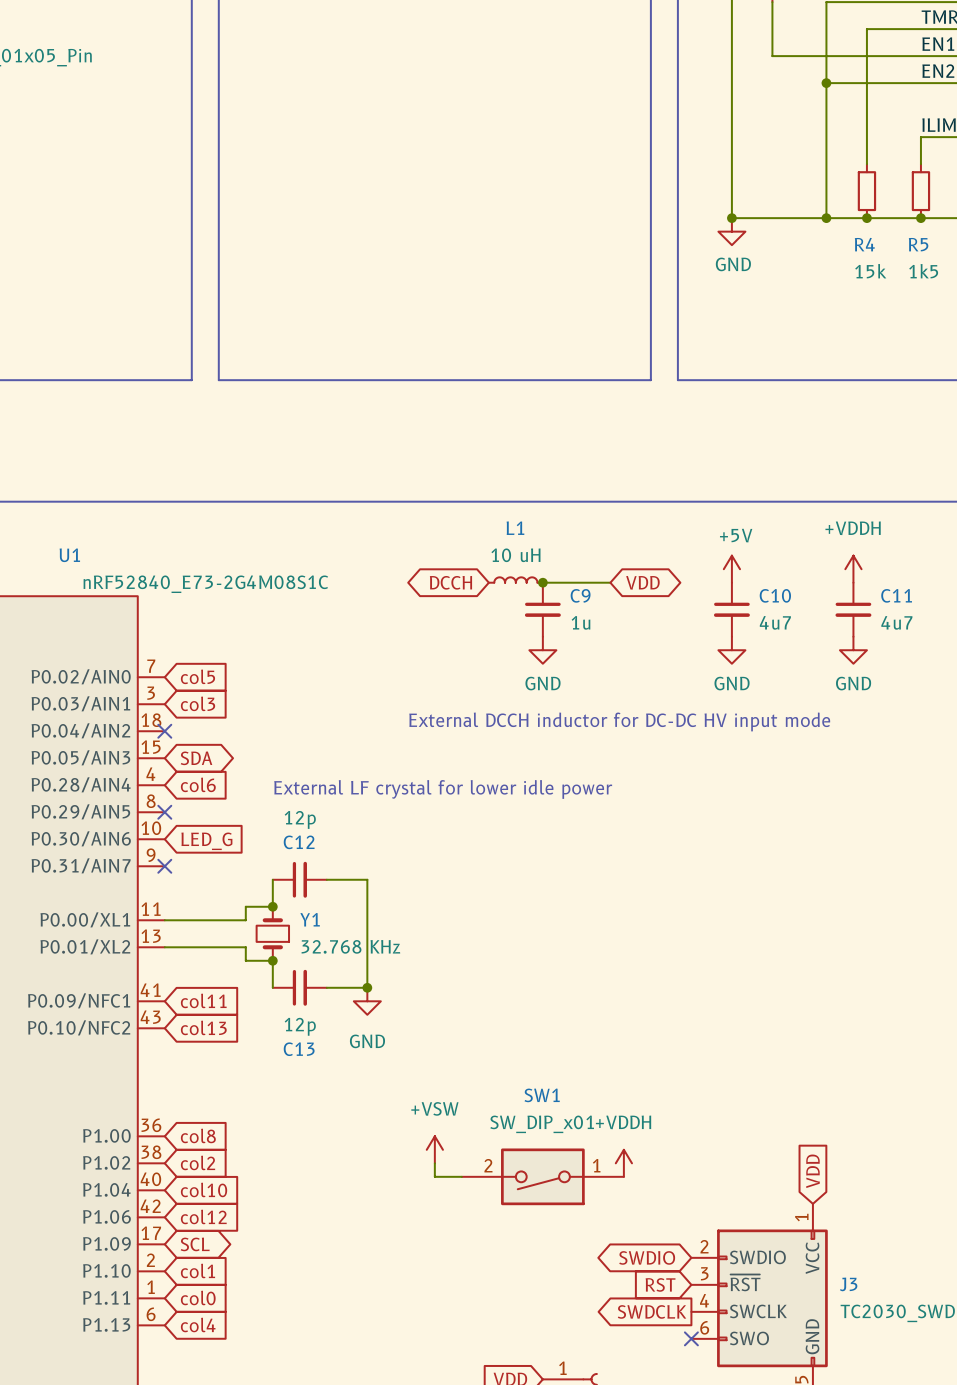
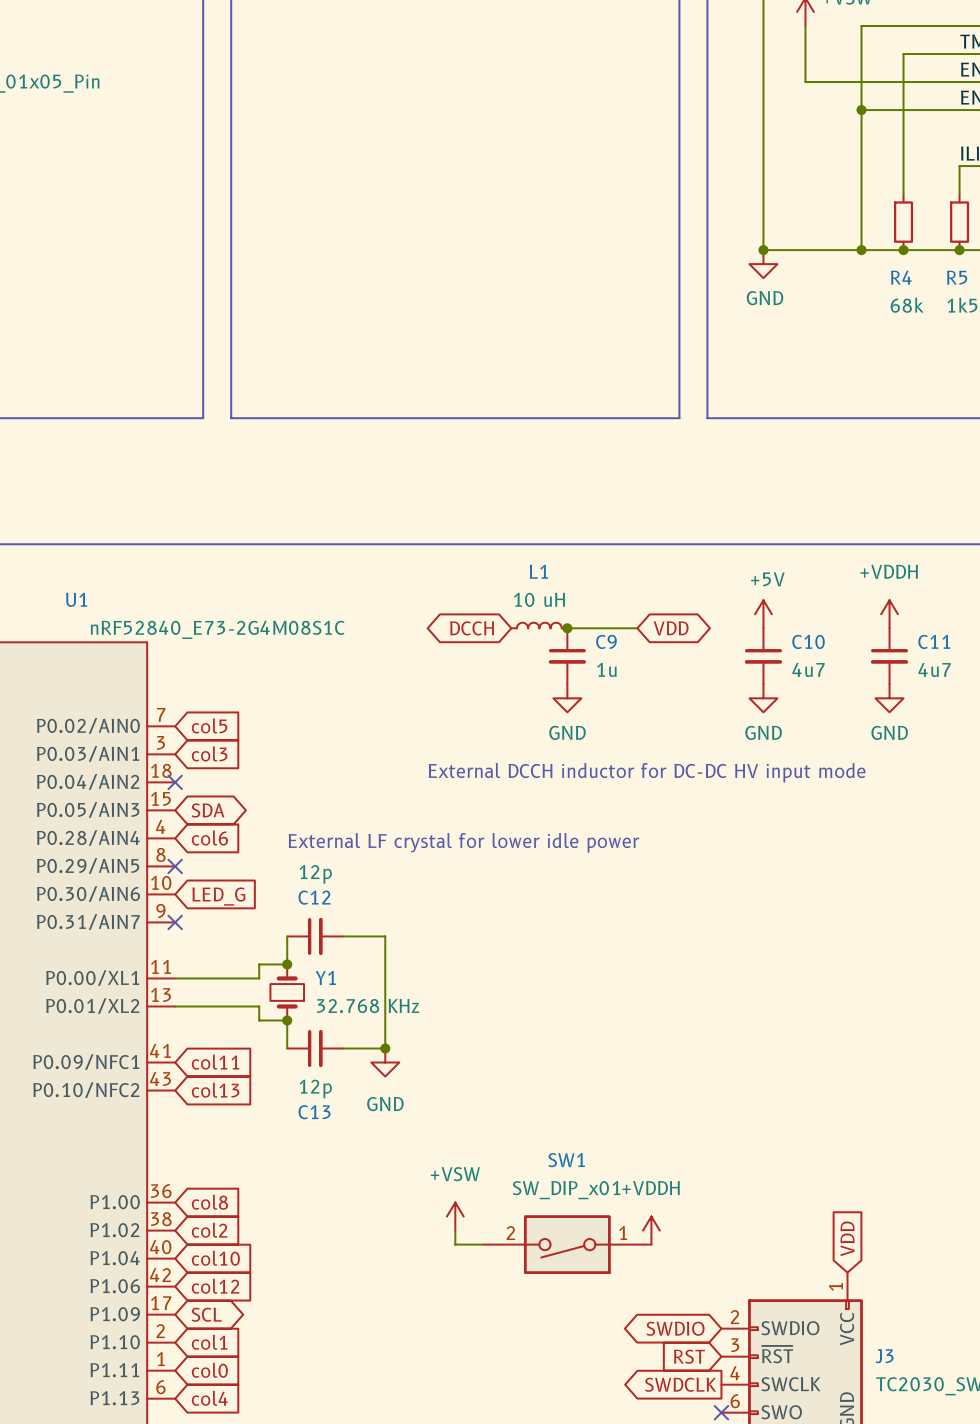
R4 value: 15k (870, 271) -> 68k (907, 305)

